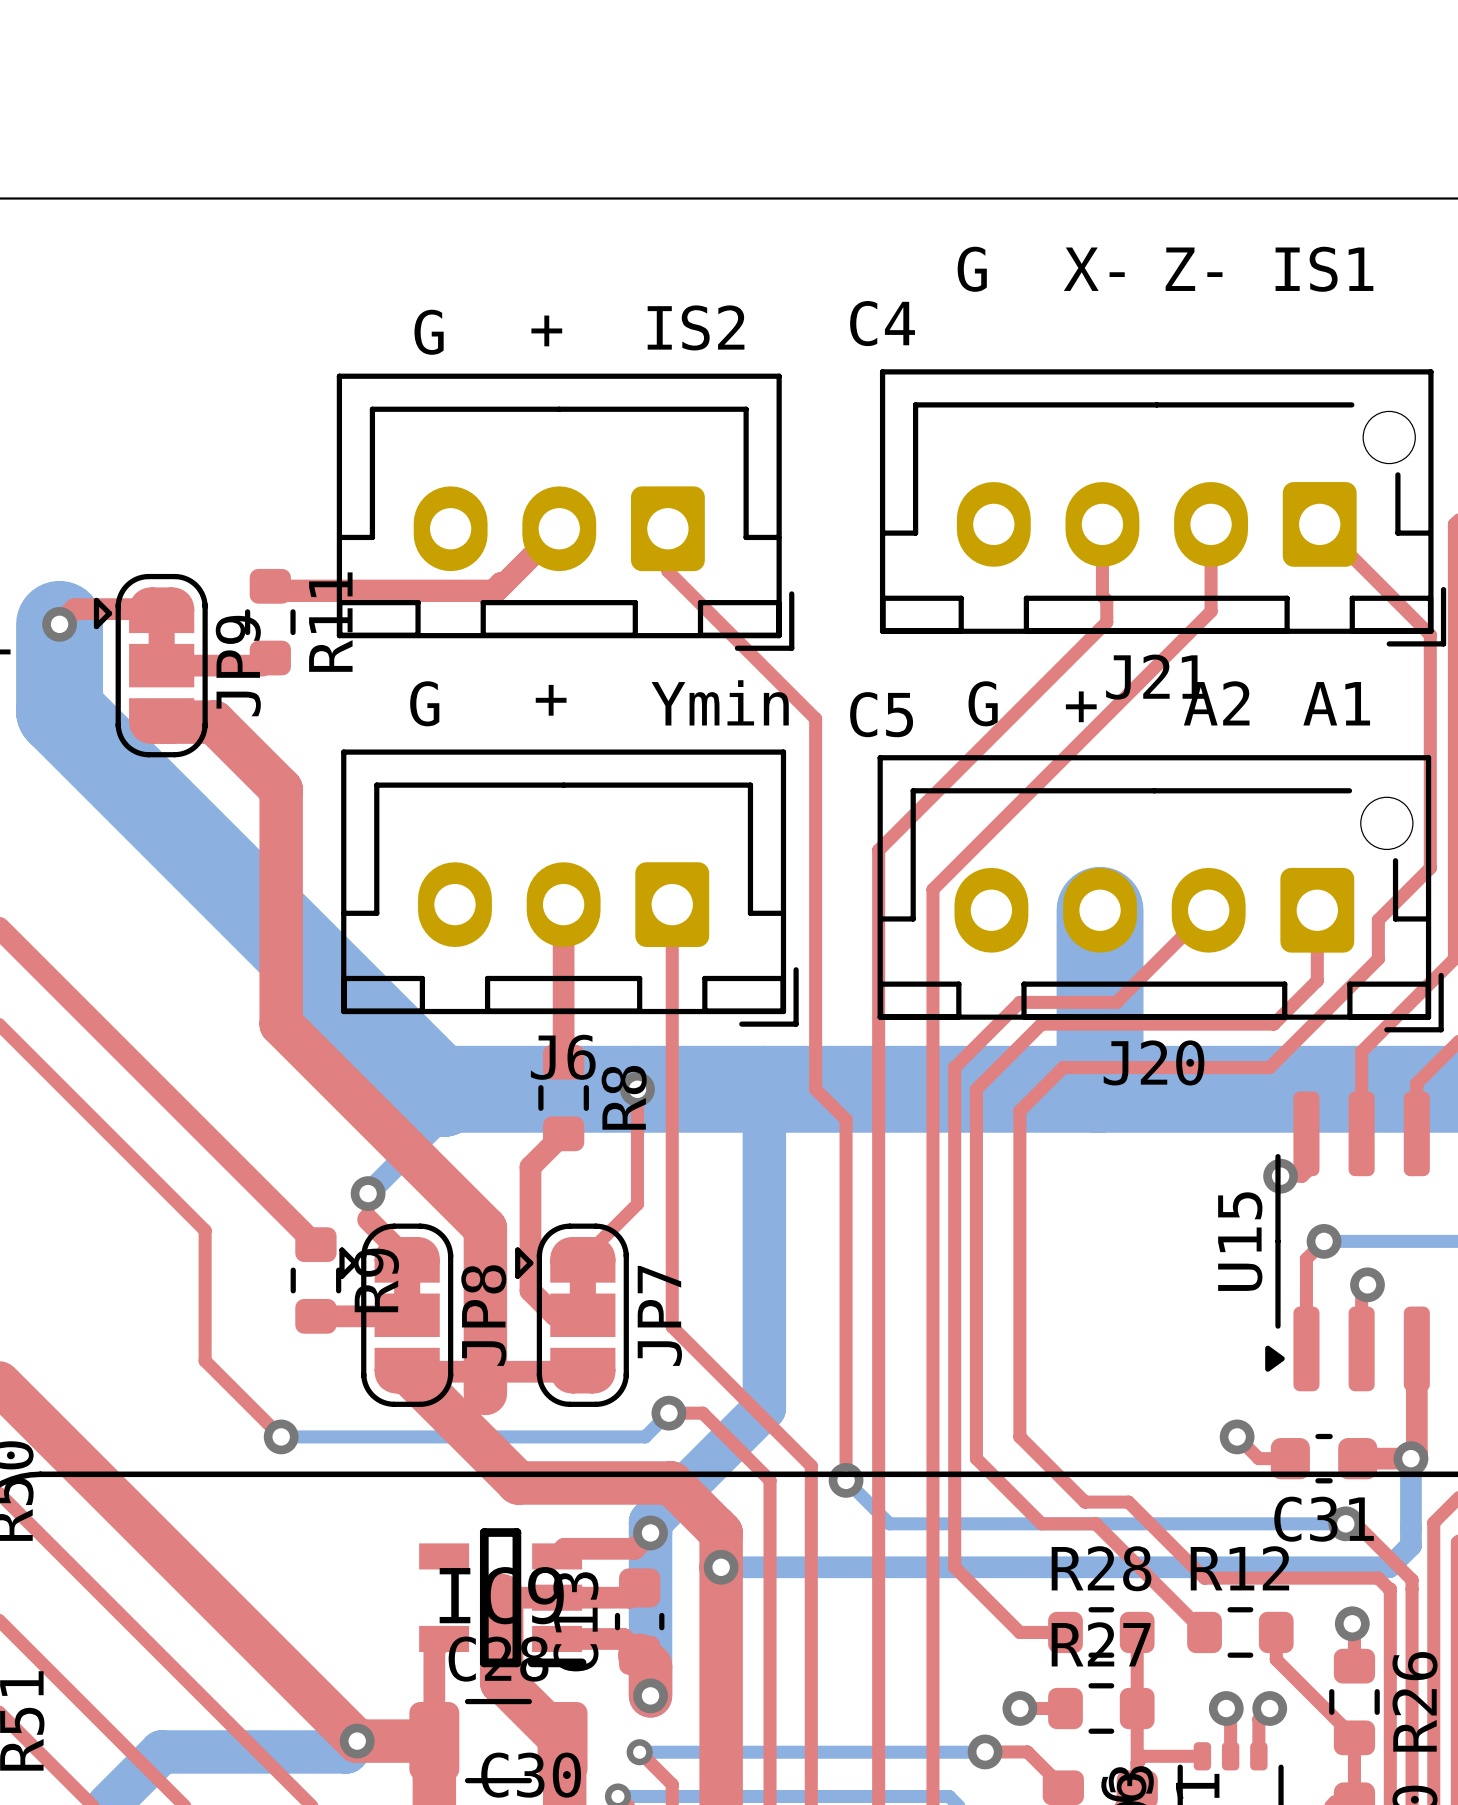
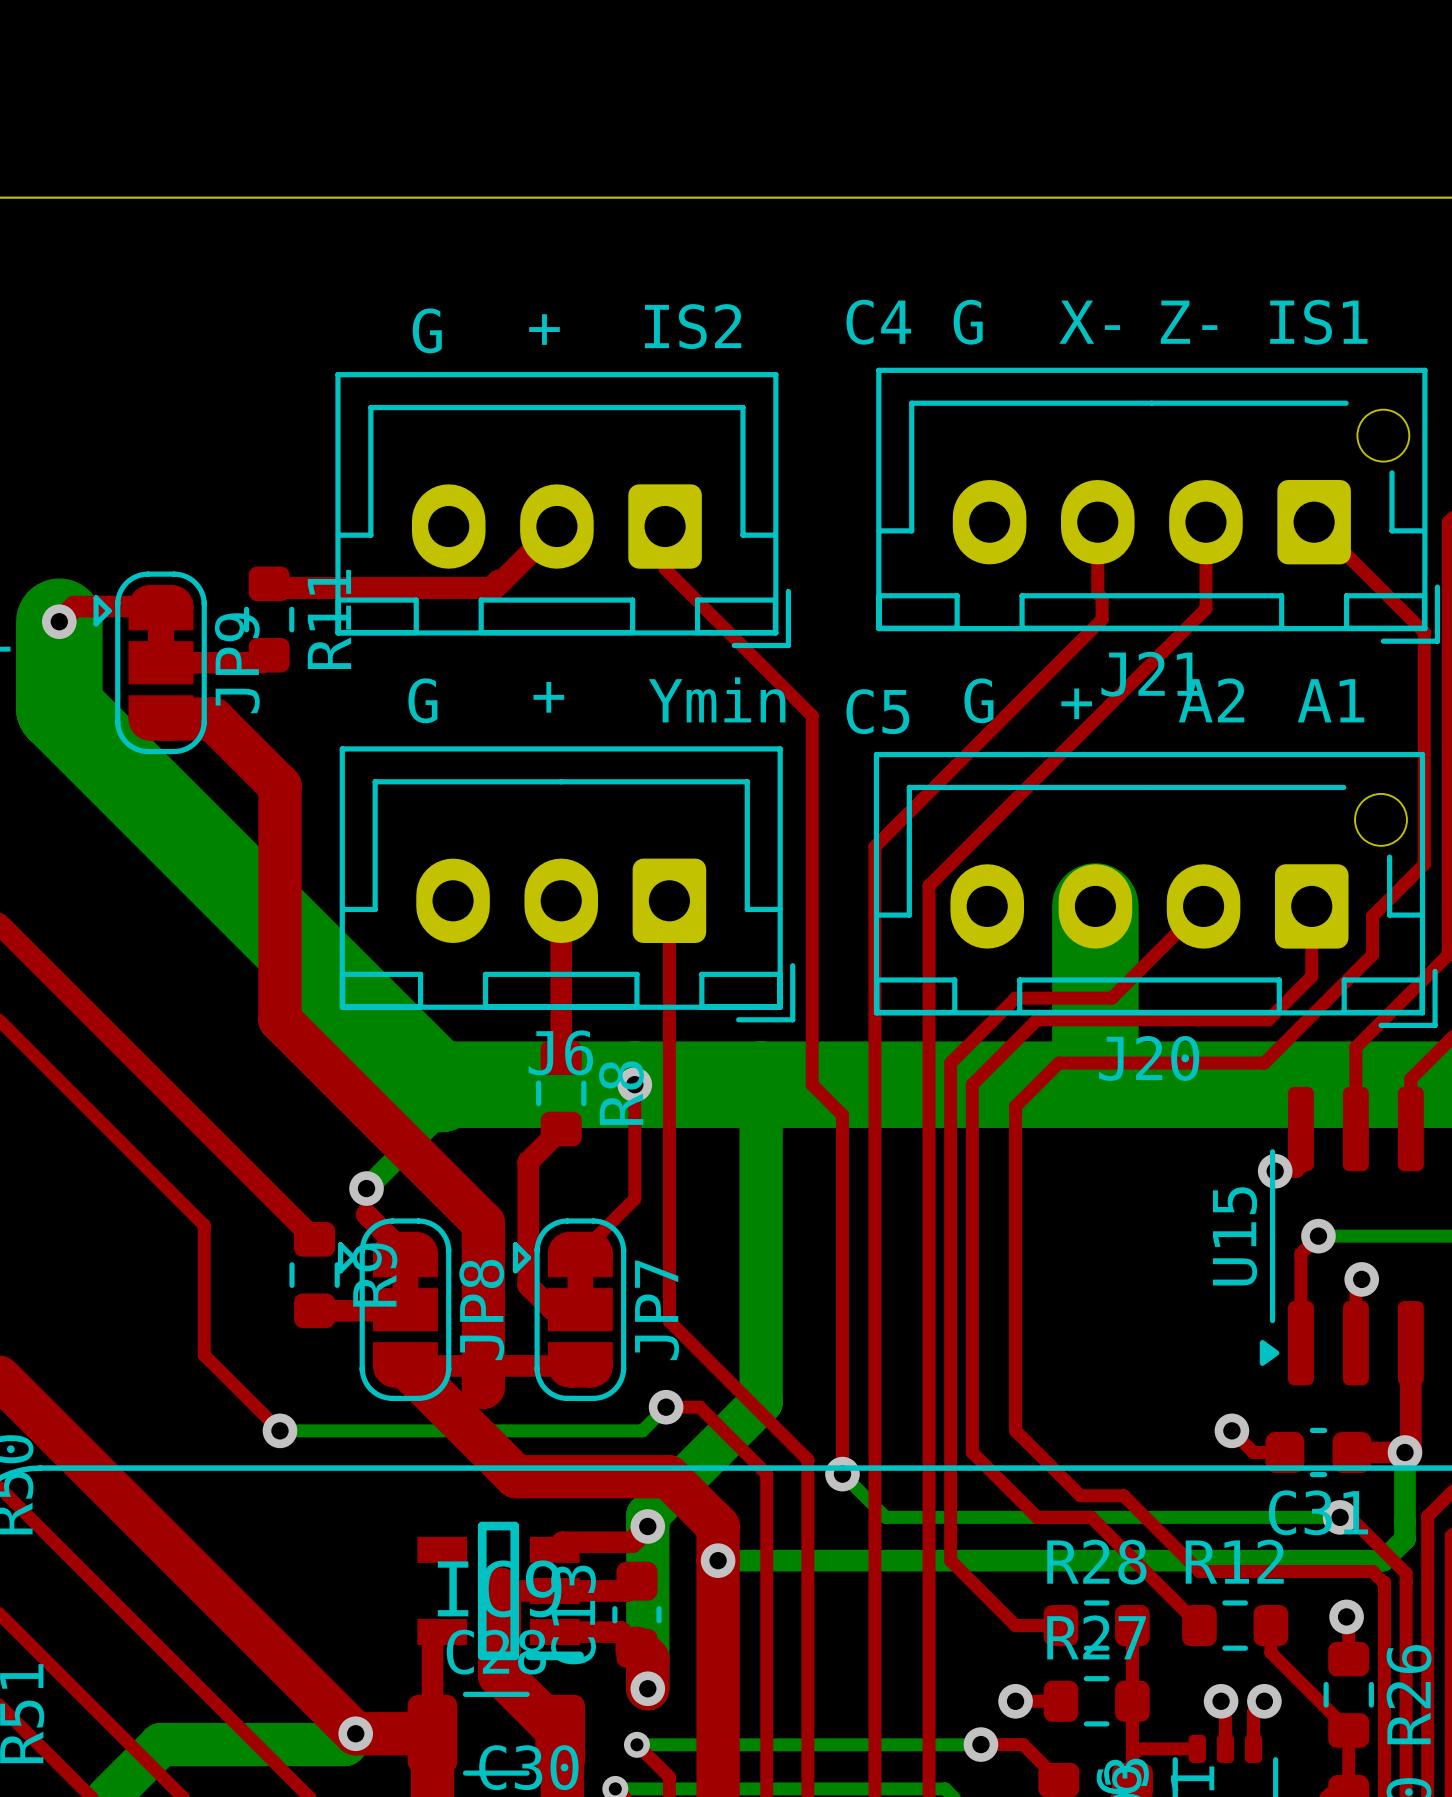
text position: G (972, 269) -> G (968, 322)
text position: X- (1094, 269) -> X- (1089, 322)
text position: Z- (1194, 269) -> Z- (1189, 322)
text position: IS1 (1324, 269) -> IS1 (1318, 322)

